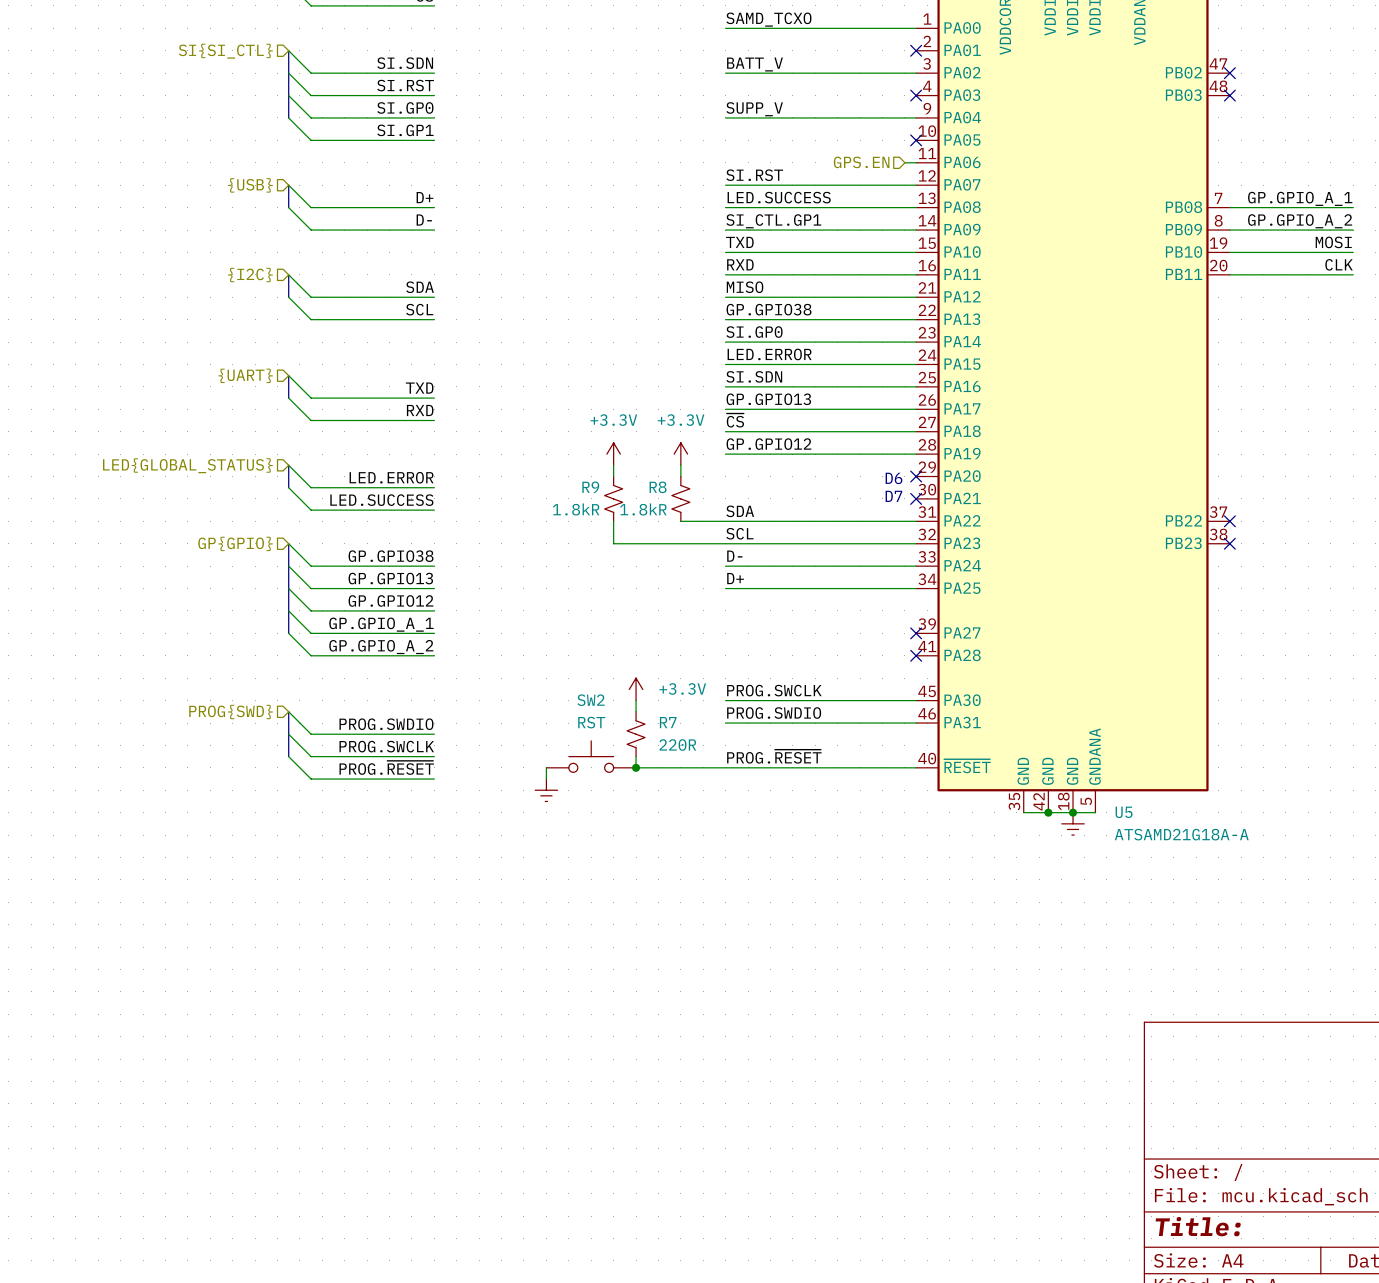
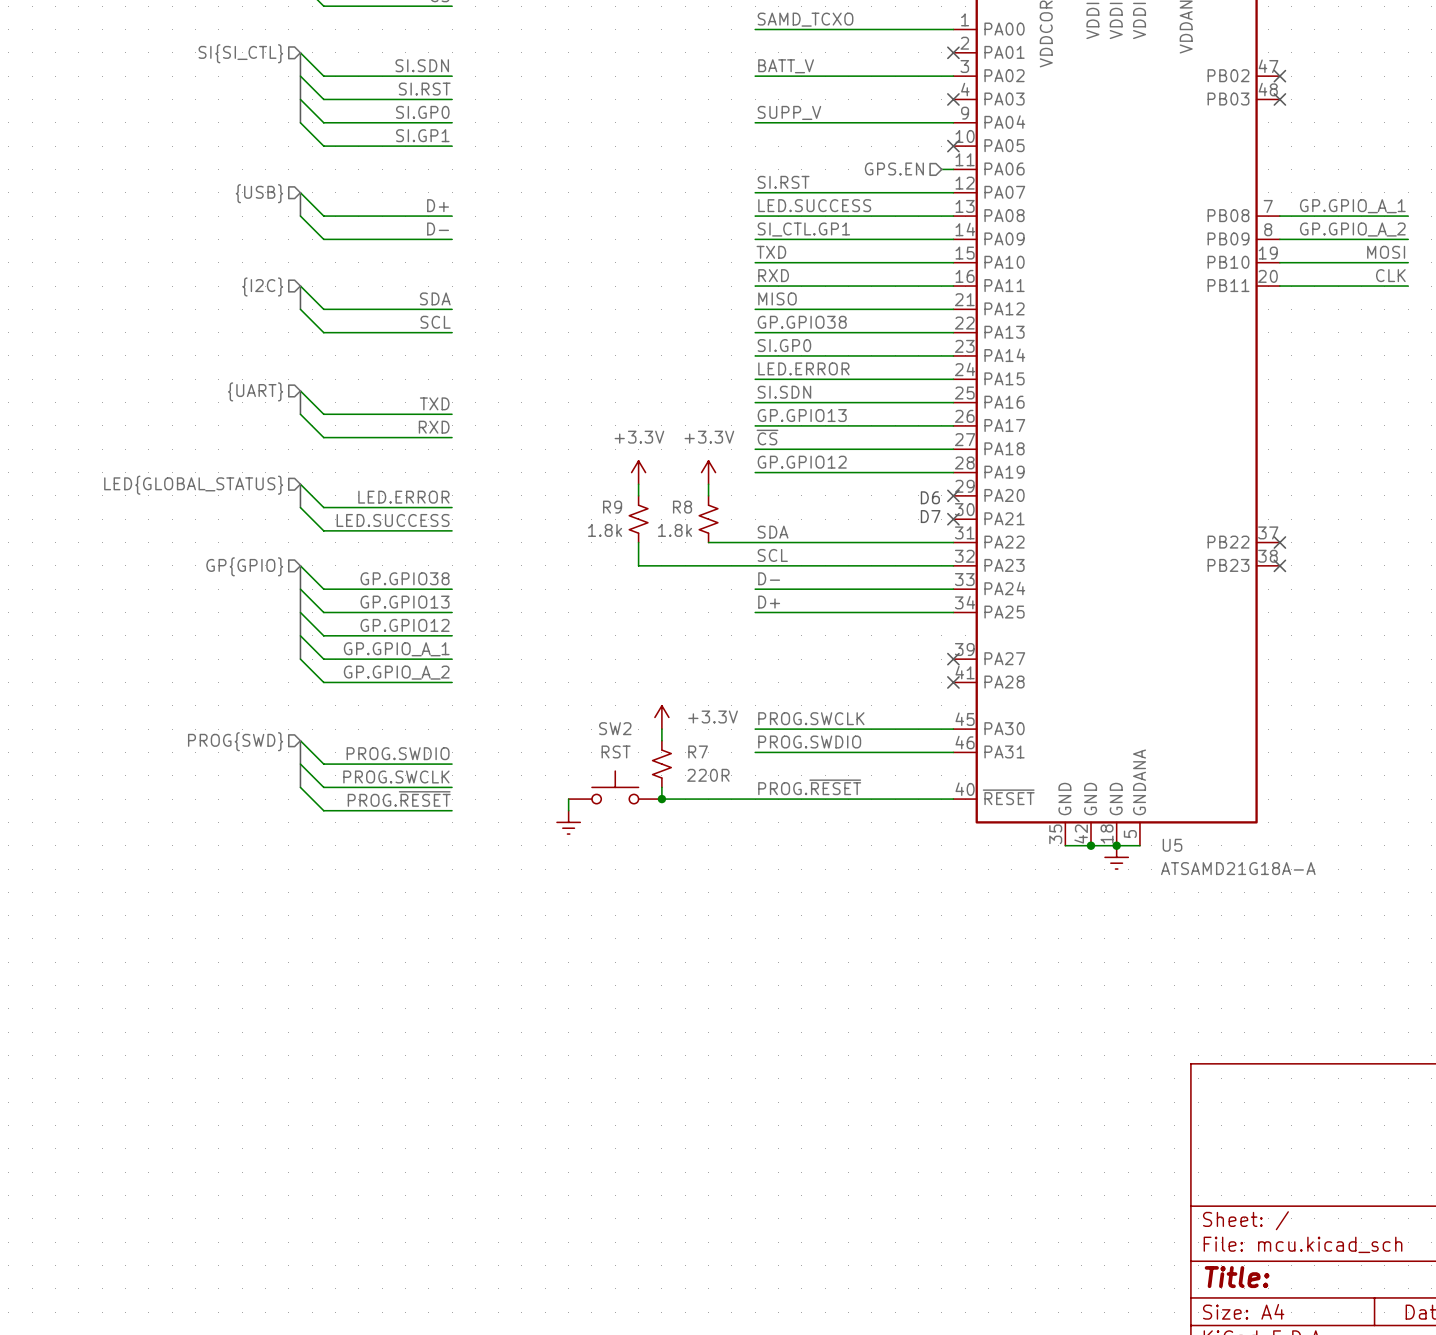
R9 value: 1.8kR (576, 509) -> 1.8k (605, 530)
R8 value: 1.8kR (643, 509) -> 1.8k (675, 530)

